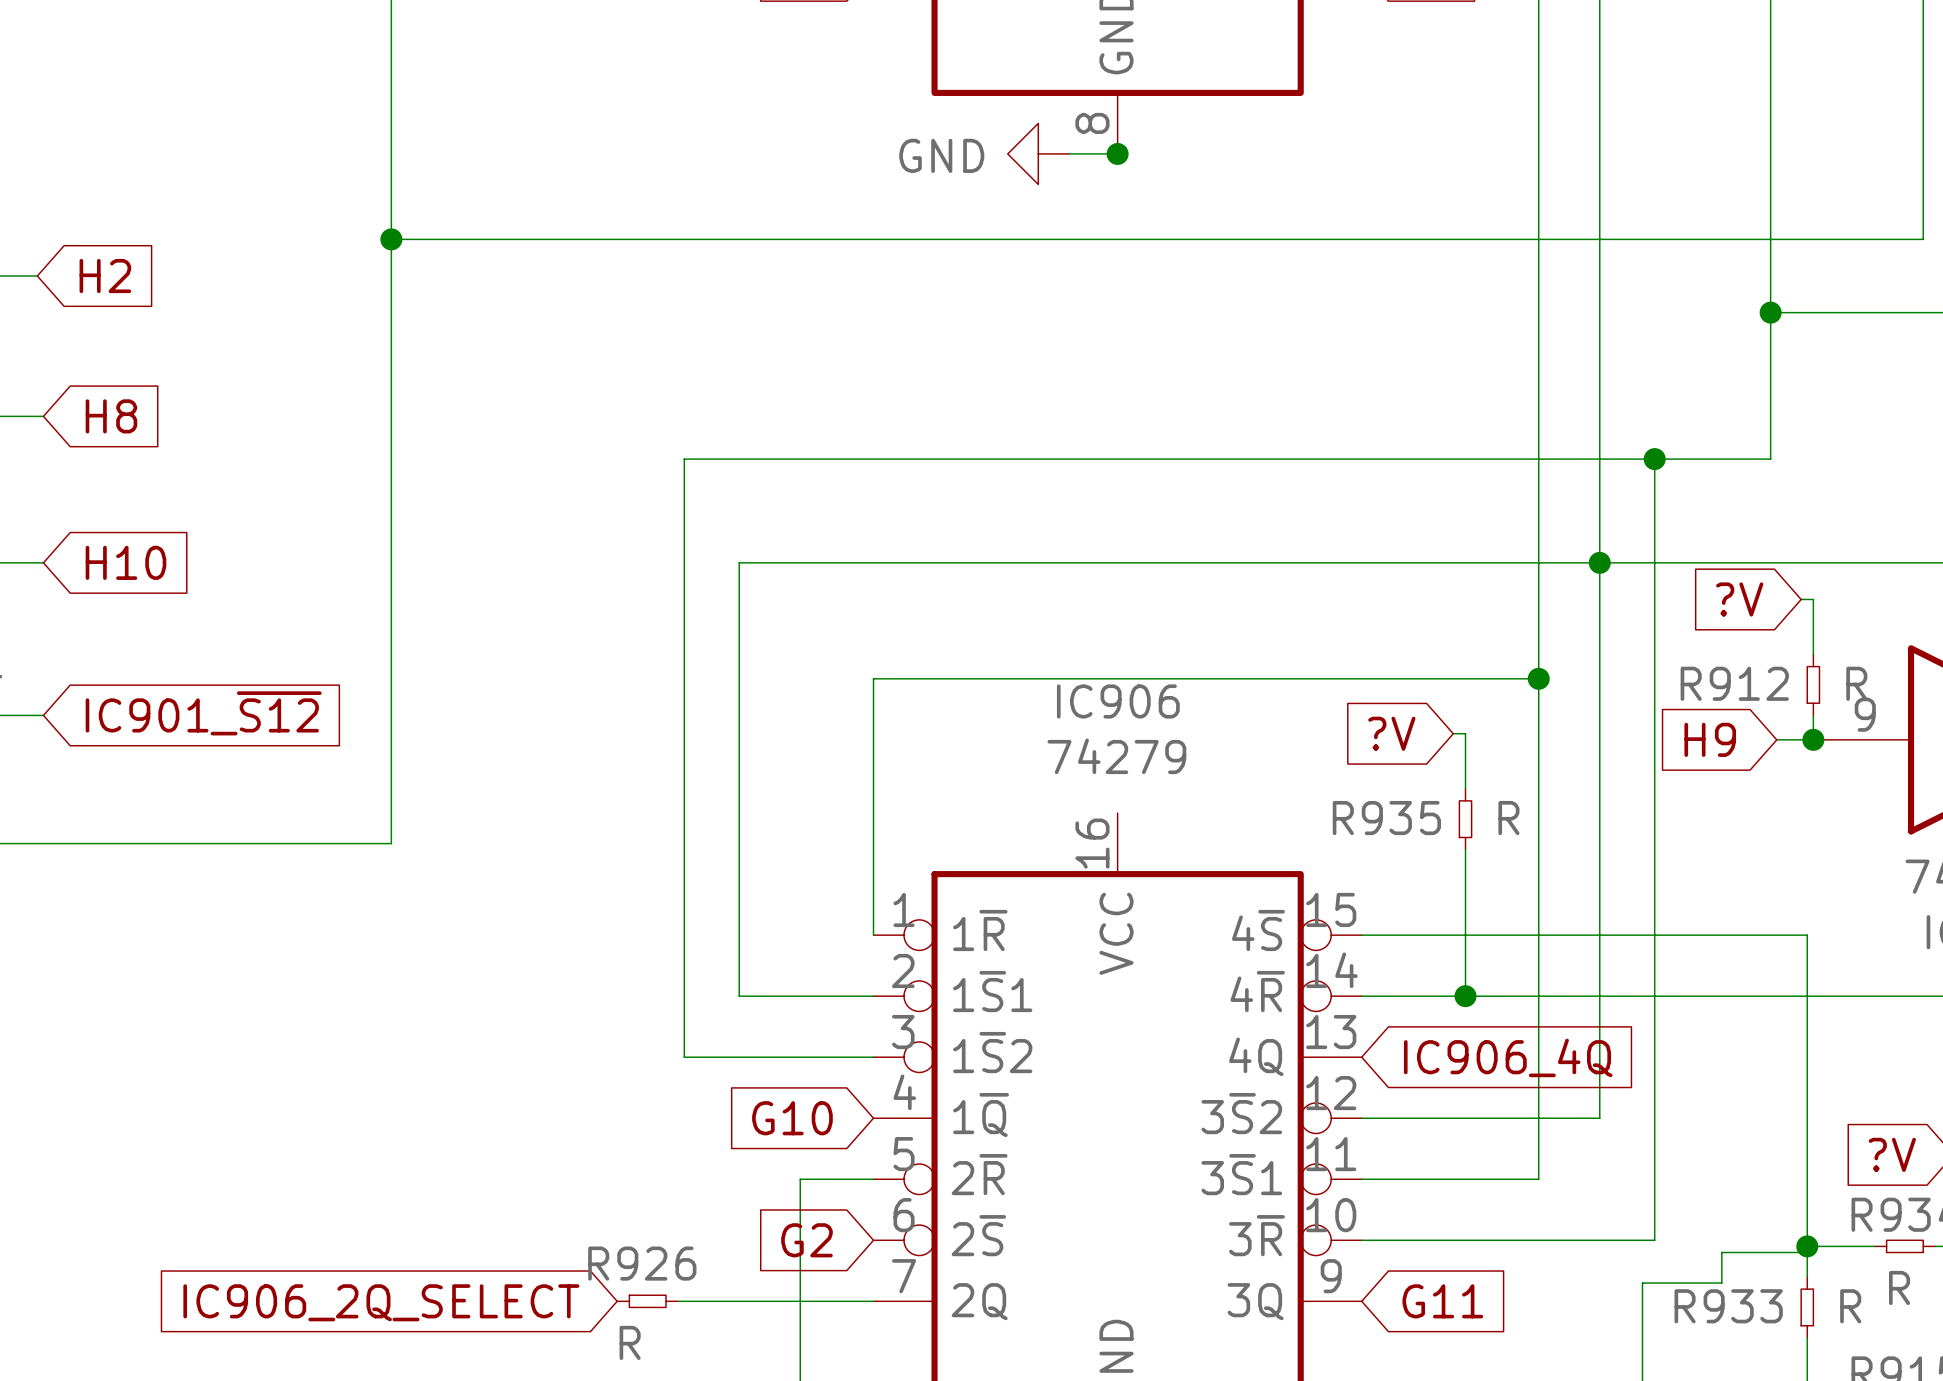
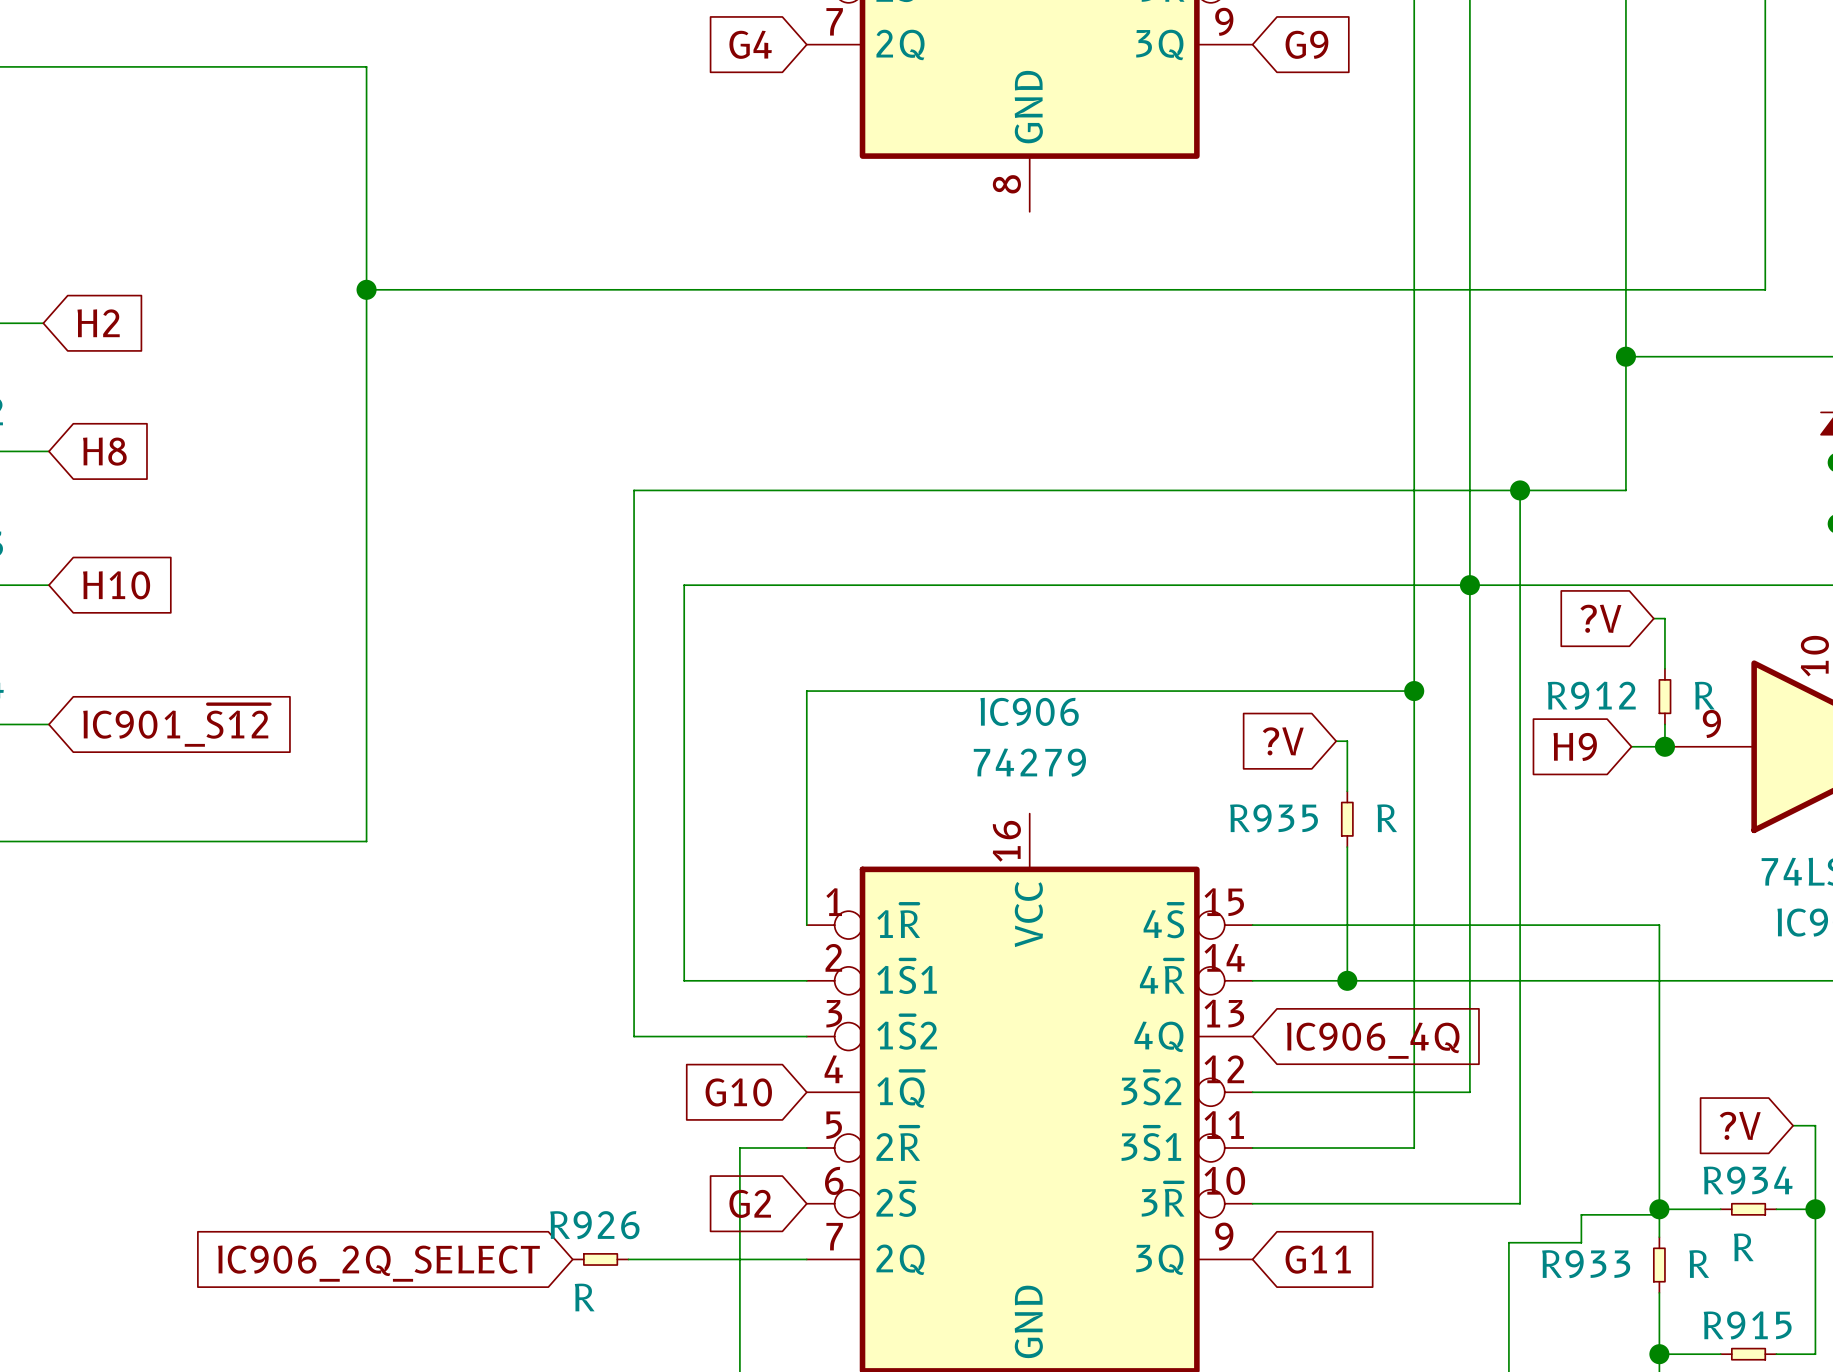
power symbol: GND (1038, 153) -> none
wire: (1068, 153) (1123, 153) -> none
junction: (1117, 153) -> none

